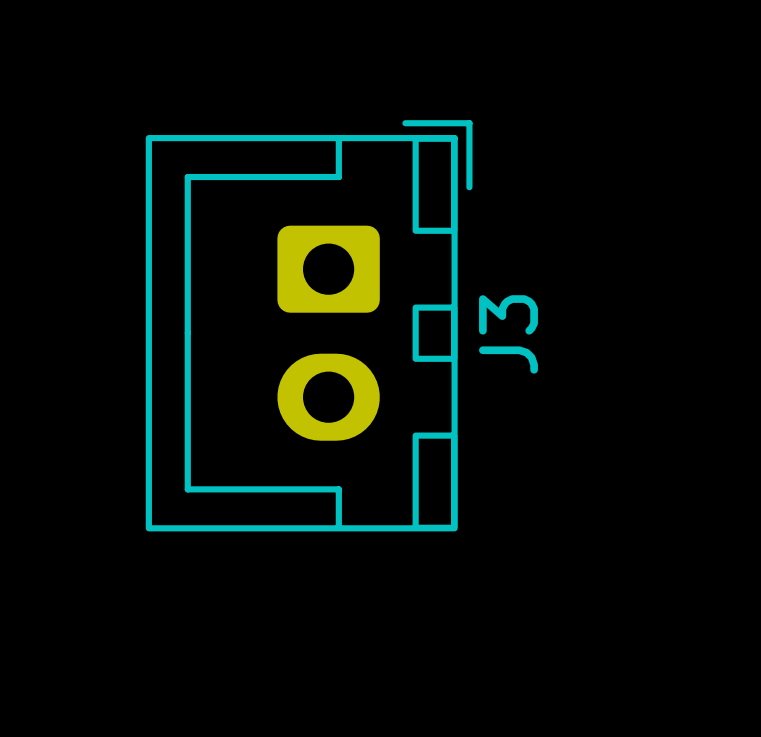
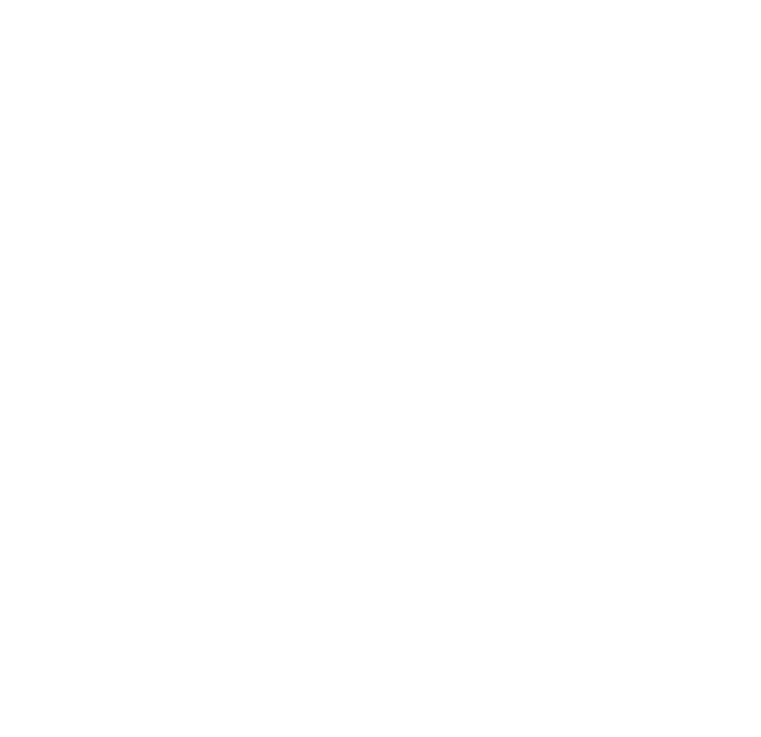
J3: (309, 325) -> none

